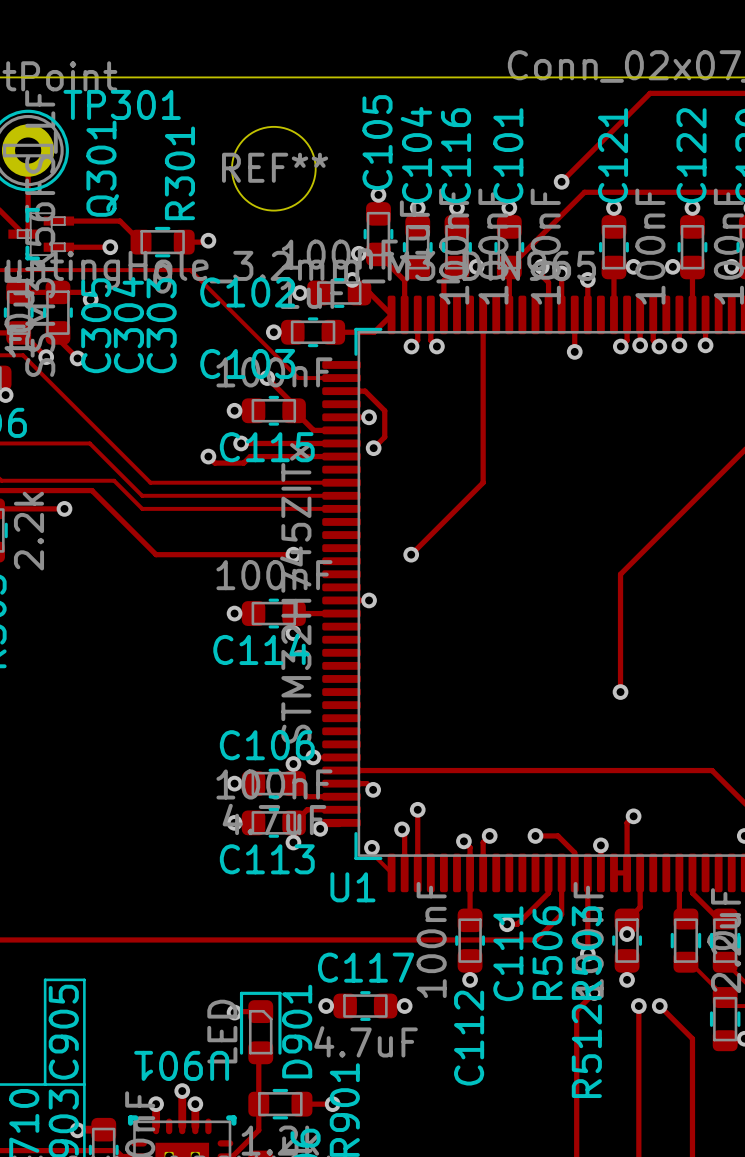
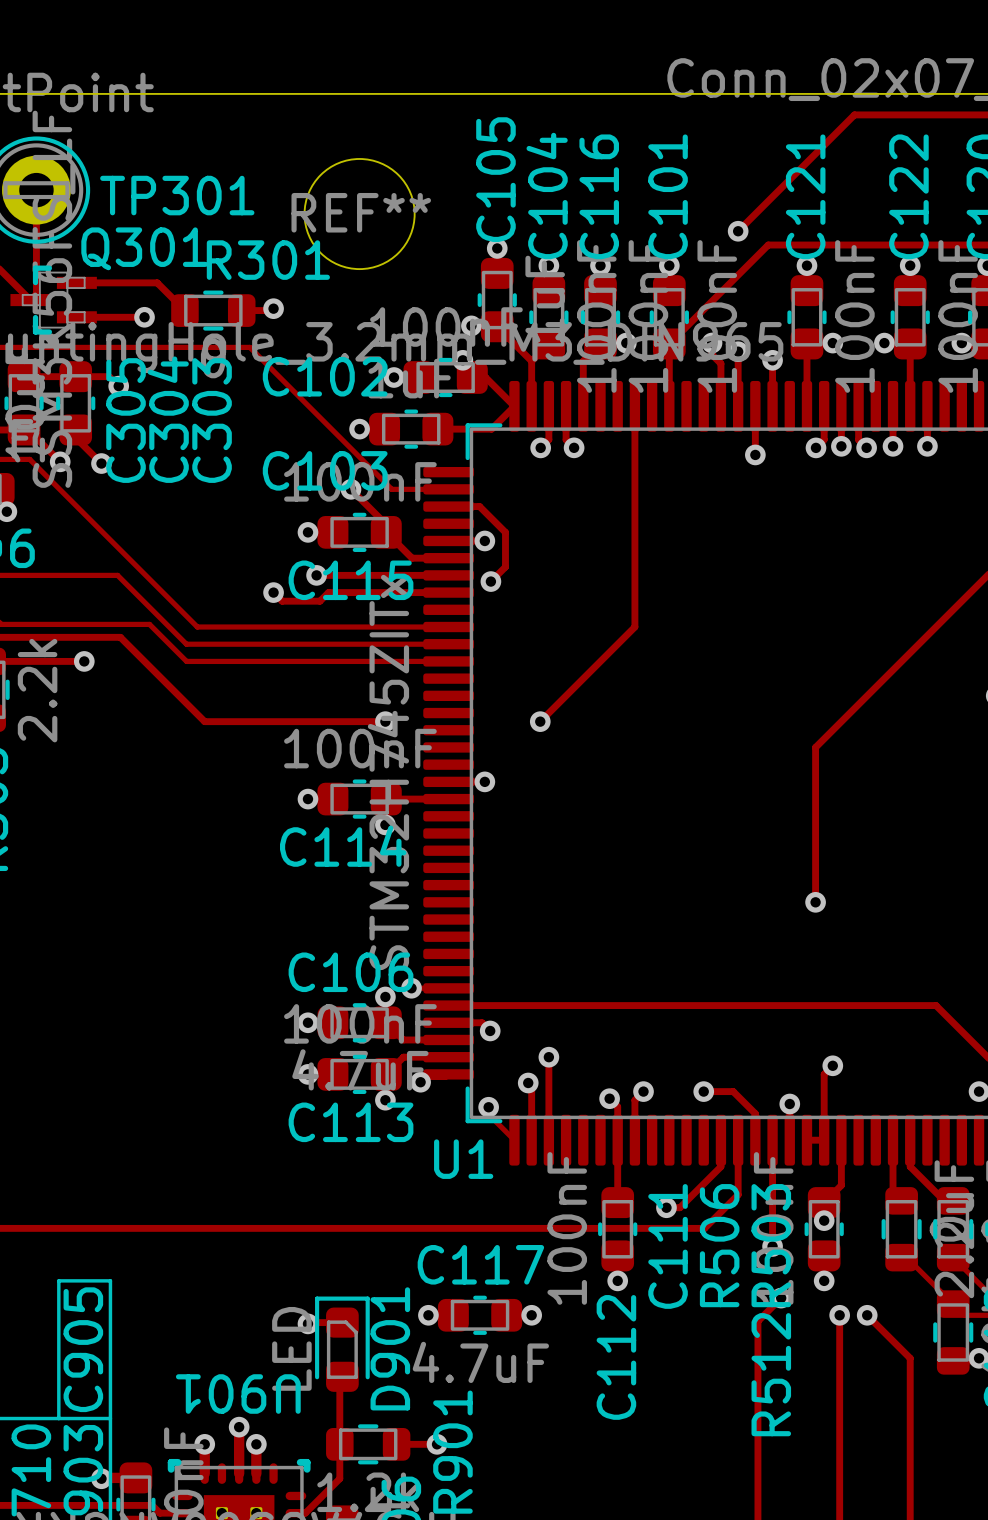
TP301 name position: TP301 (122, 104) -> TP301 (177, 195)
Q301 name rotation: 0° (102, 168) -> 90° clockwise (144, 248)
R301 name rotation: 0° (179, 173) -> 90° clockwise (268, 260)

